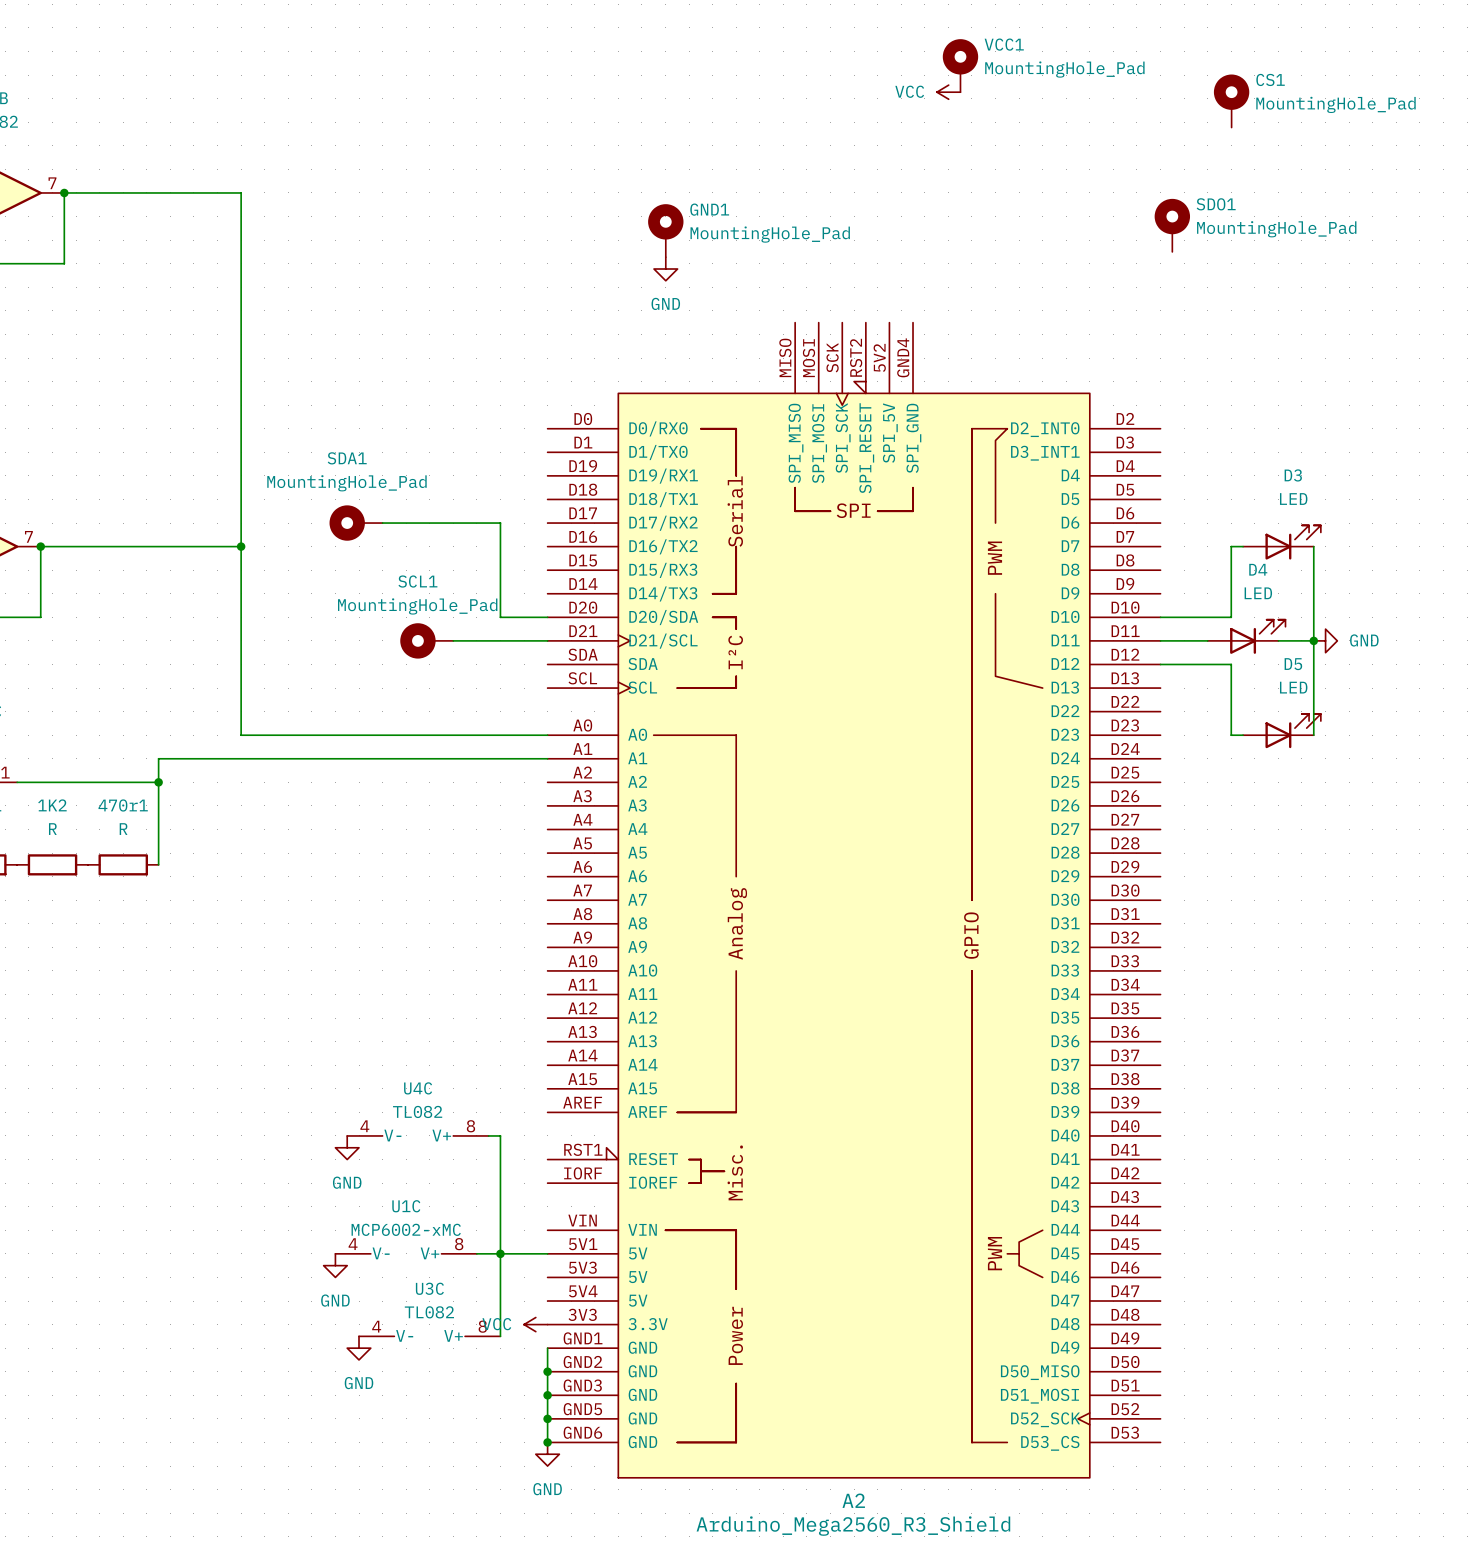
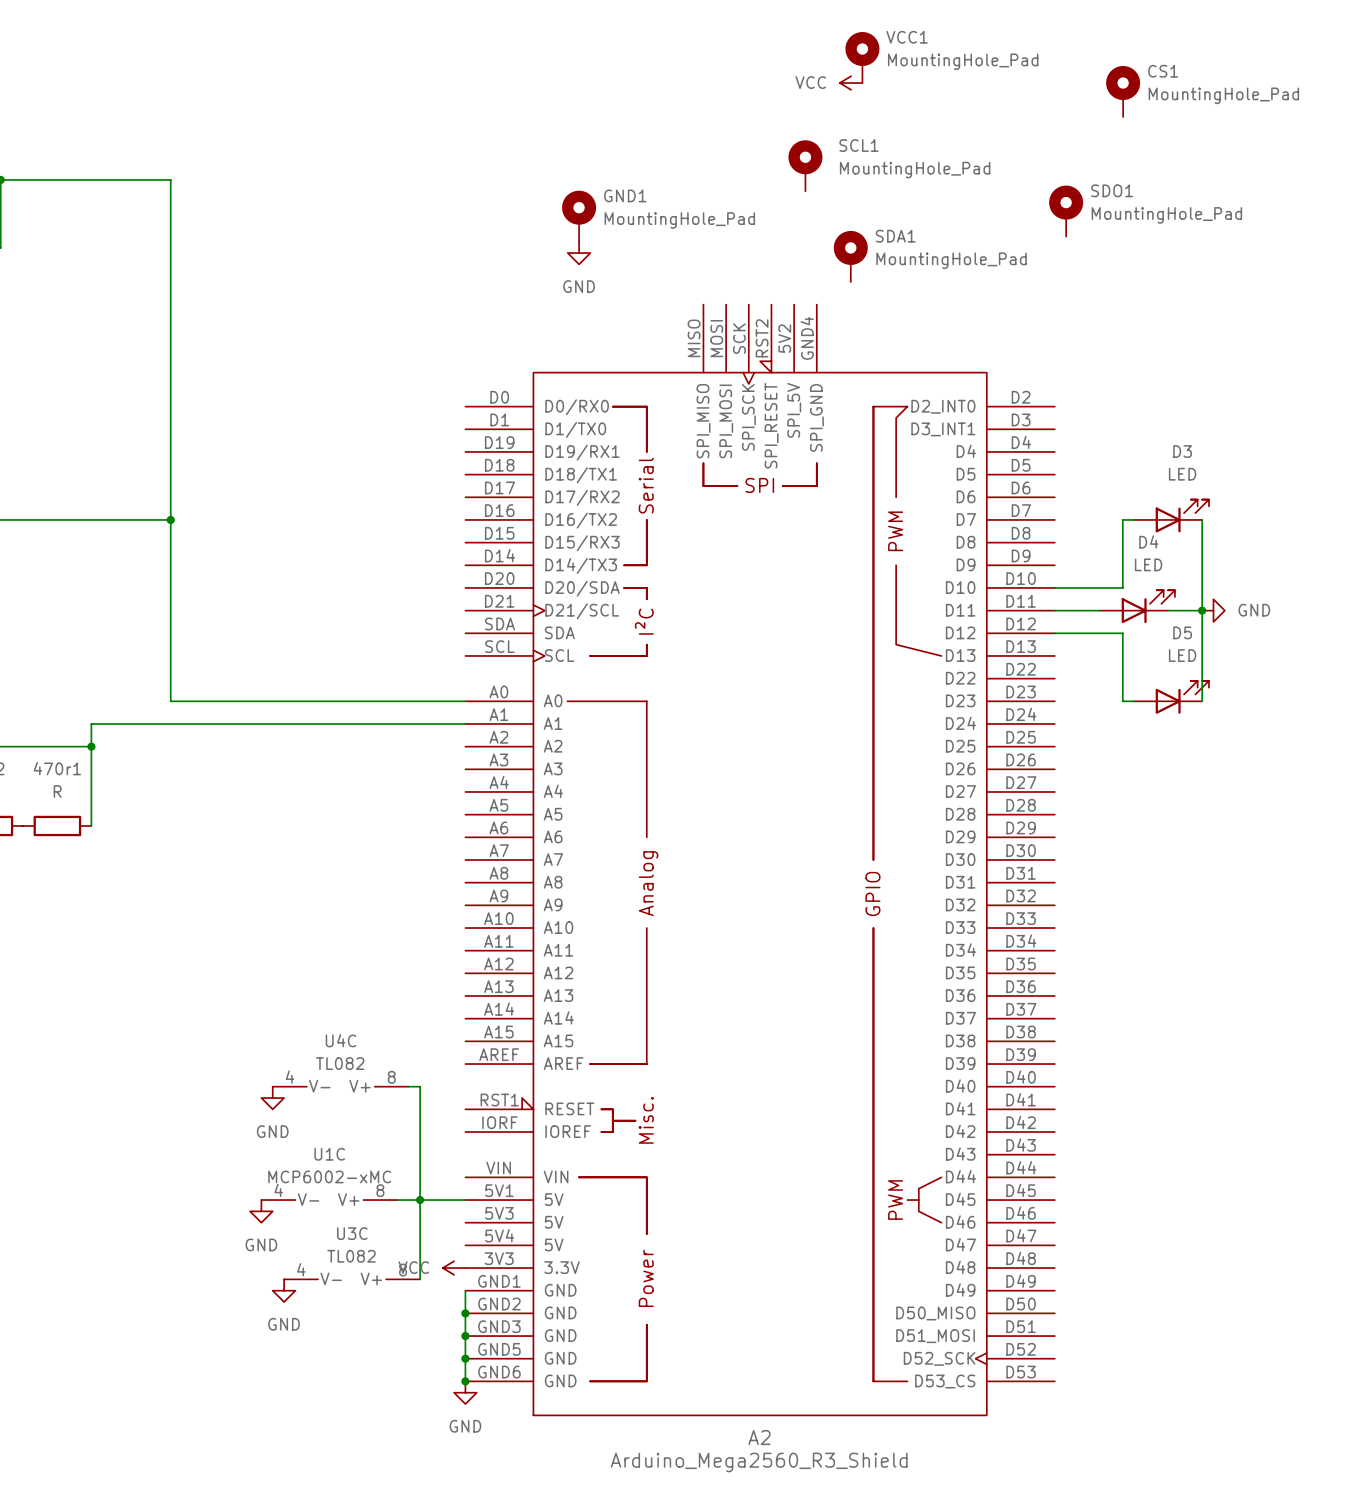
SDA1 value position: MountingHole_Pad (346, 483) -> MountingHole_Pad (951, 260)
SDA1 rotation: 0° (347, 523) -> 90° clockwise (850, 247)
SDA1 position: (356, 523) -> (850, 256)
wire: (382, 523) (500, 523) (500, 617) (547, 617) -> none
SCL1 value position: MountingHole_Pad (417, 606) -> MountingHole_Pad (915, 170)
SCL1 rotation: 0° (417, 640) -> 90° clockwise (805, 157)
SCL1 position: (426, 640) -> (805, 165)
wire: (453, 640) (547, 640) -> none

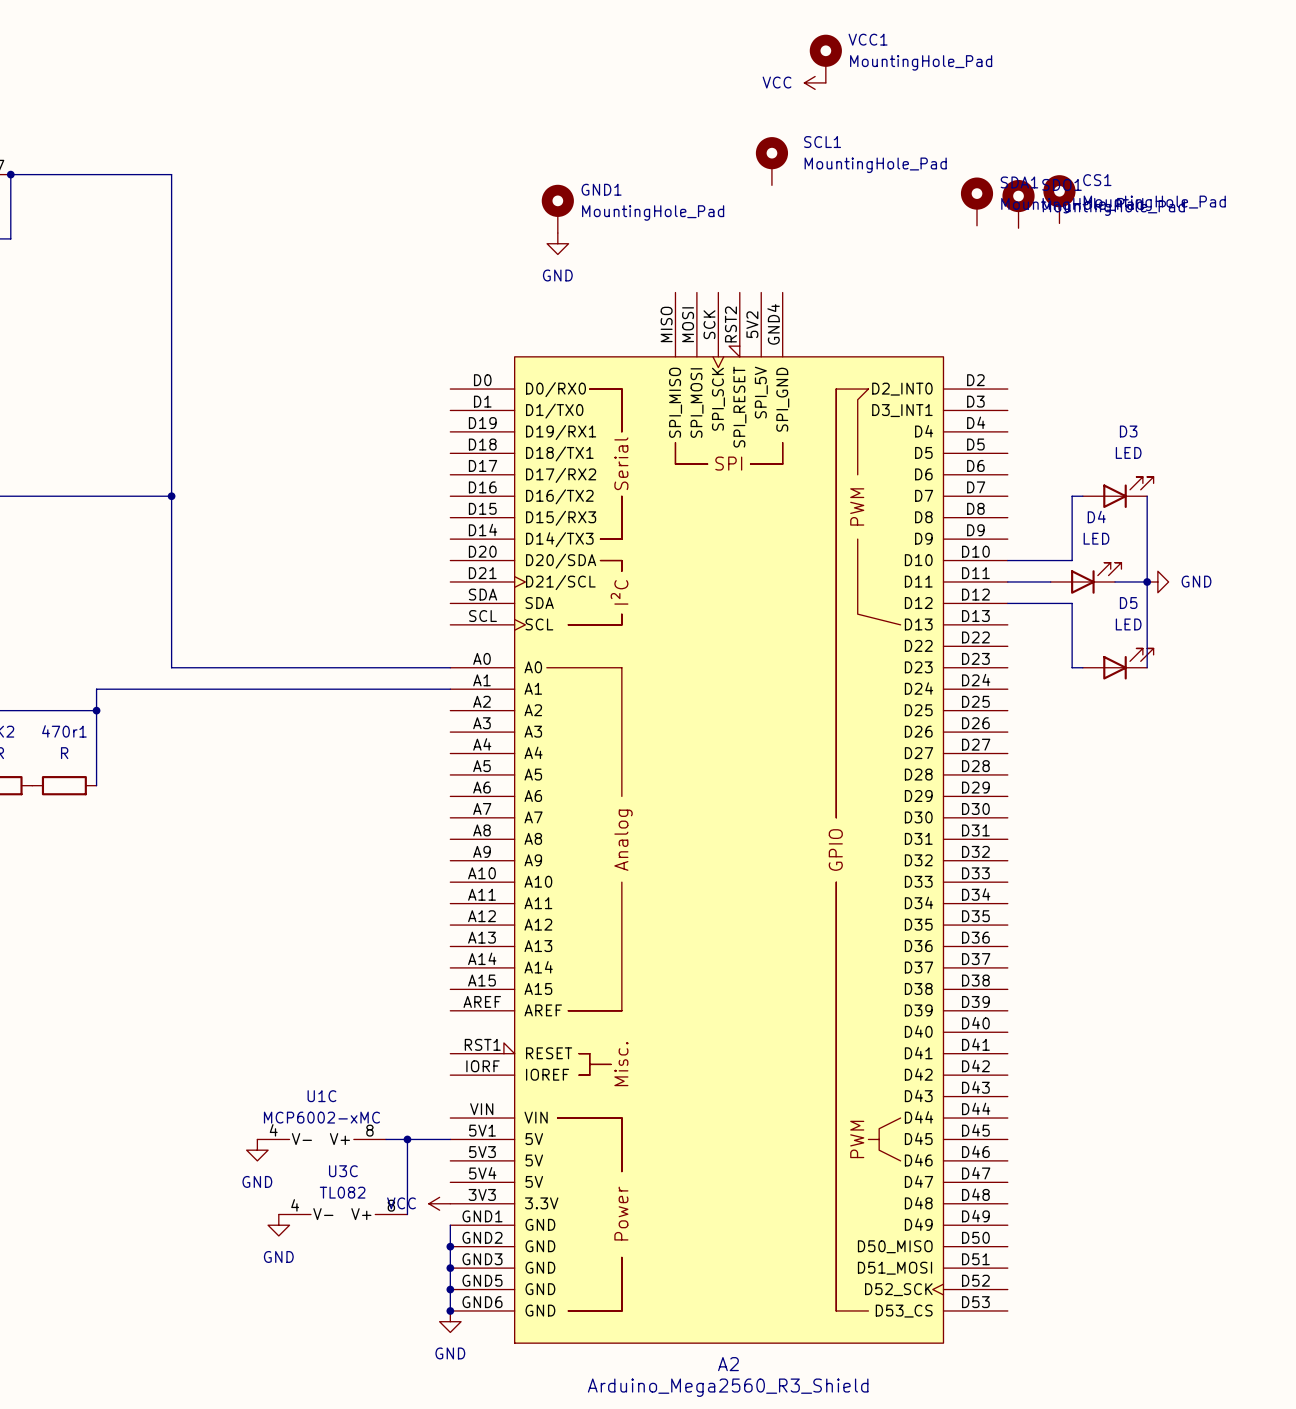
CS1 position: (1123, 91) -> (1059, 199)
SDA1 position: (850, 256) -> (977, 201)
U4C: TL082 (340, 1086) -> none
wire: (408, 1086) (420, 1086) (420, 1200) -> none
power symbol: GND (272, 1098) -> none

